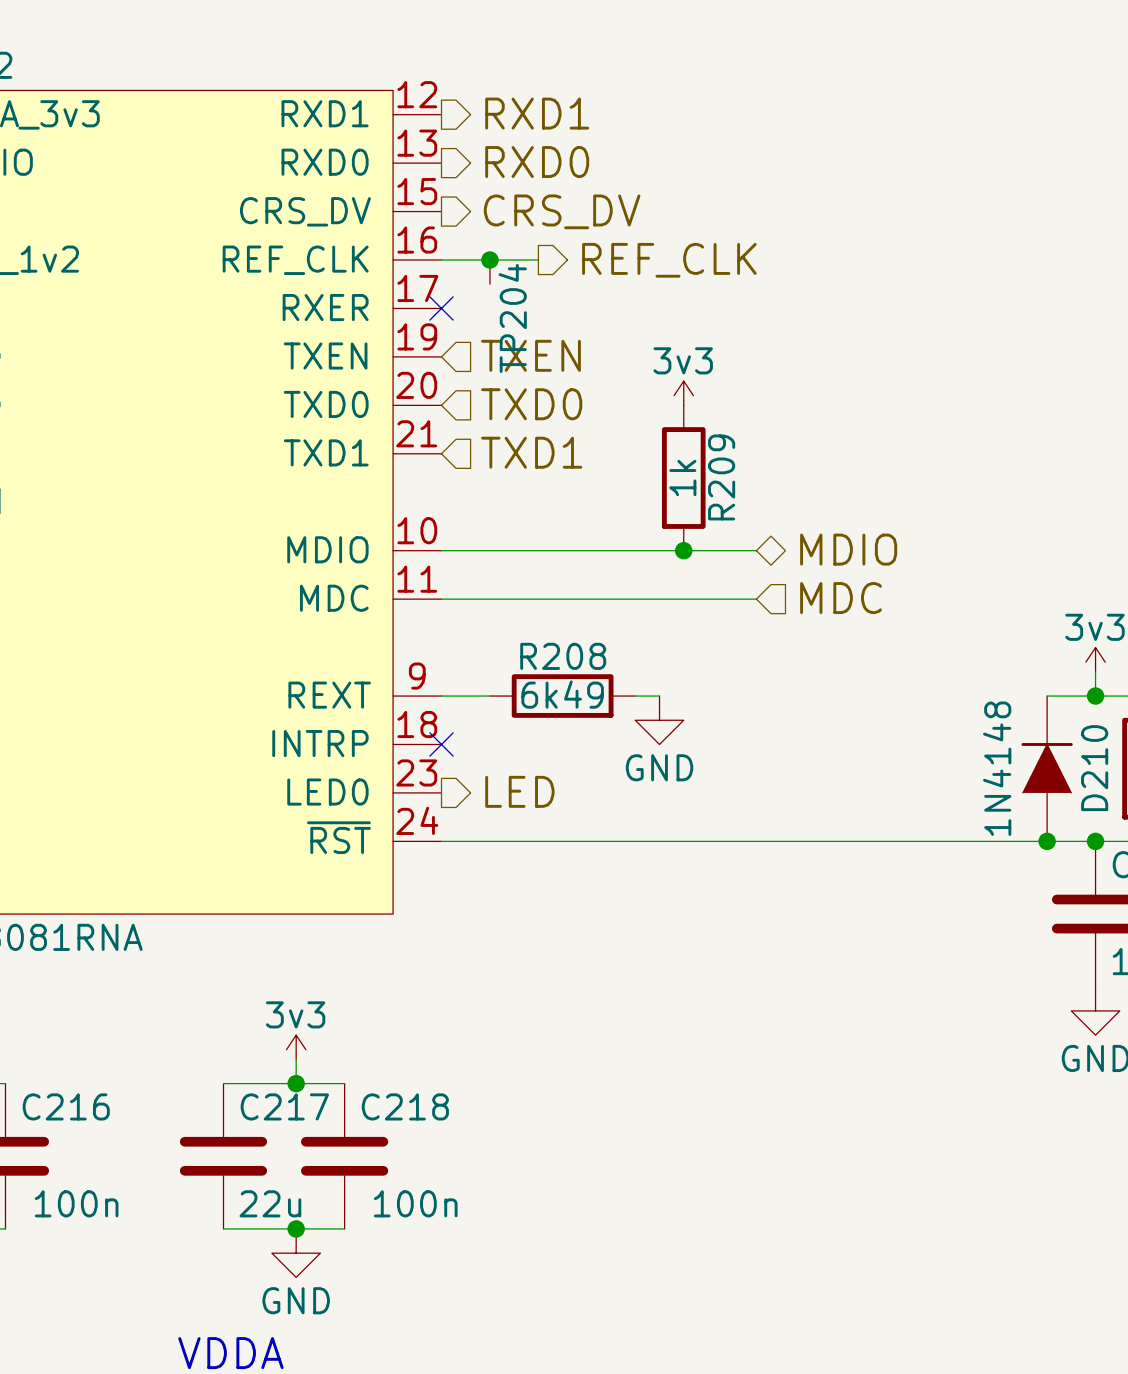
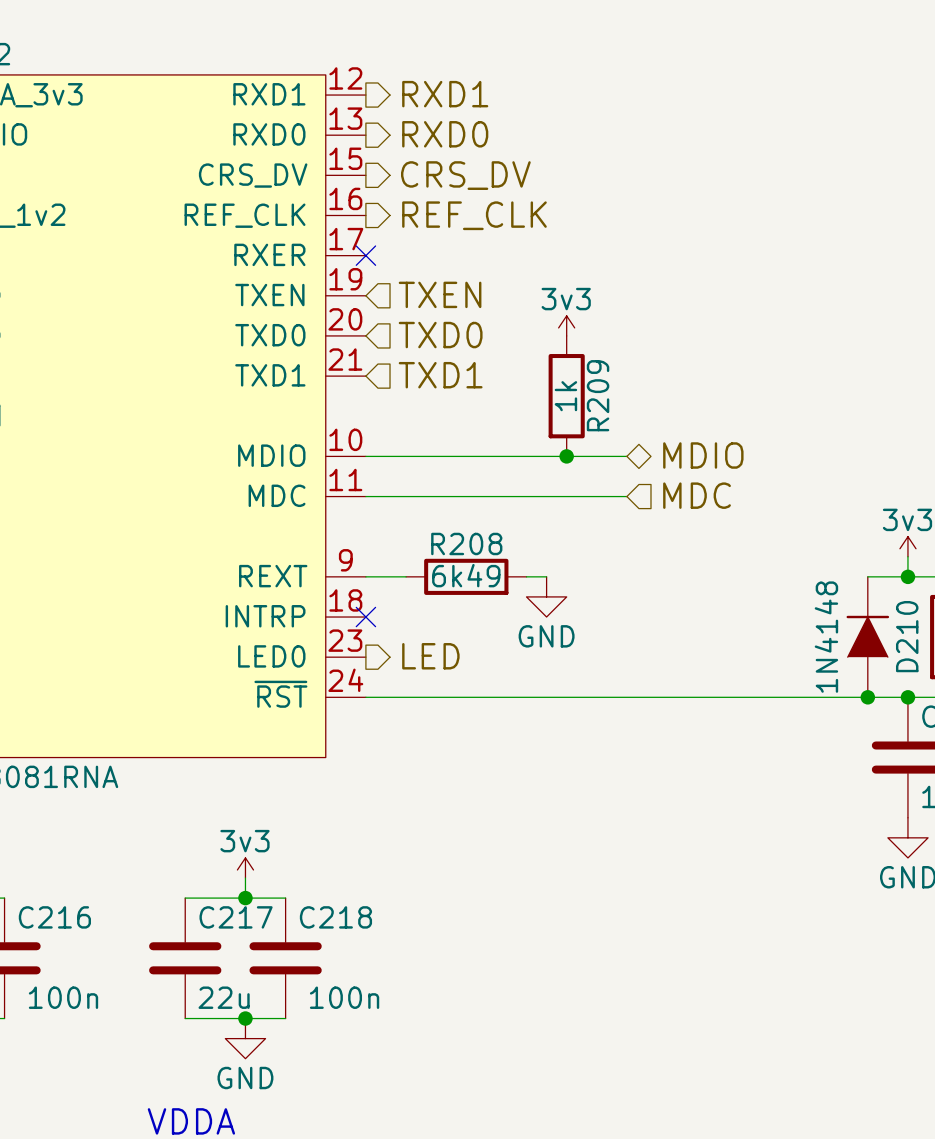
wire: (441, 260) (538, 260) -> none
junction: (489, 260) -> none
hierarchical label position: REF_CLK (669, 260) -> REF_CLK (474, 215)
TP204: (489, 277) -> none

